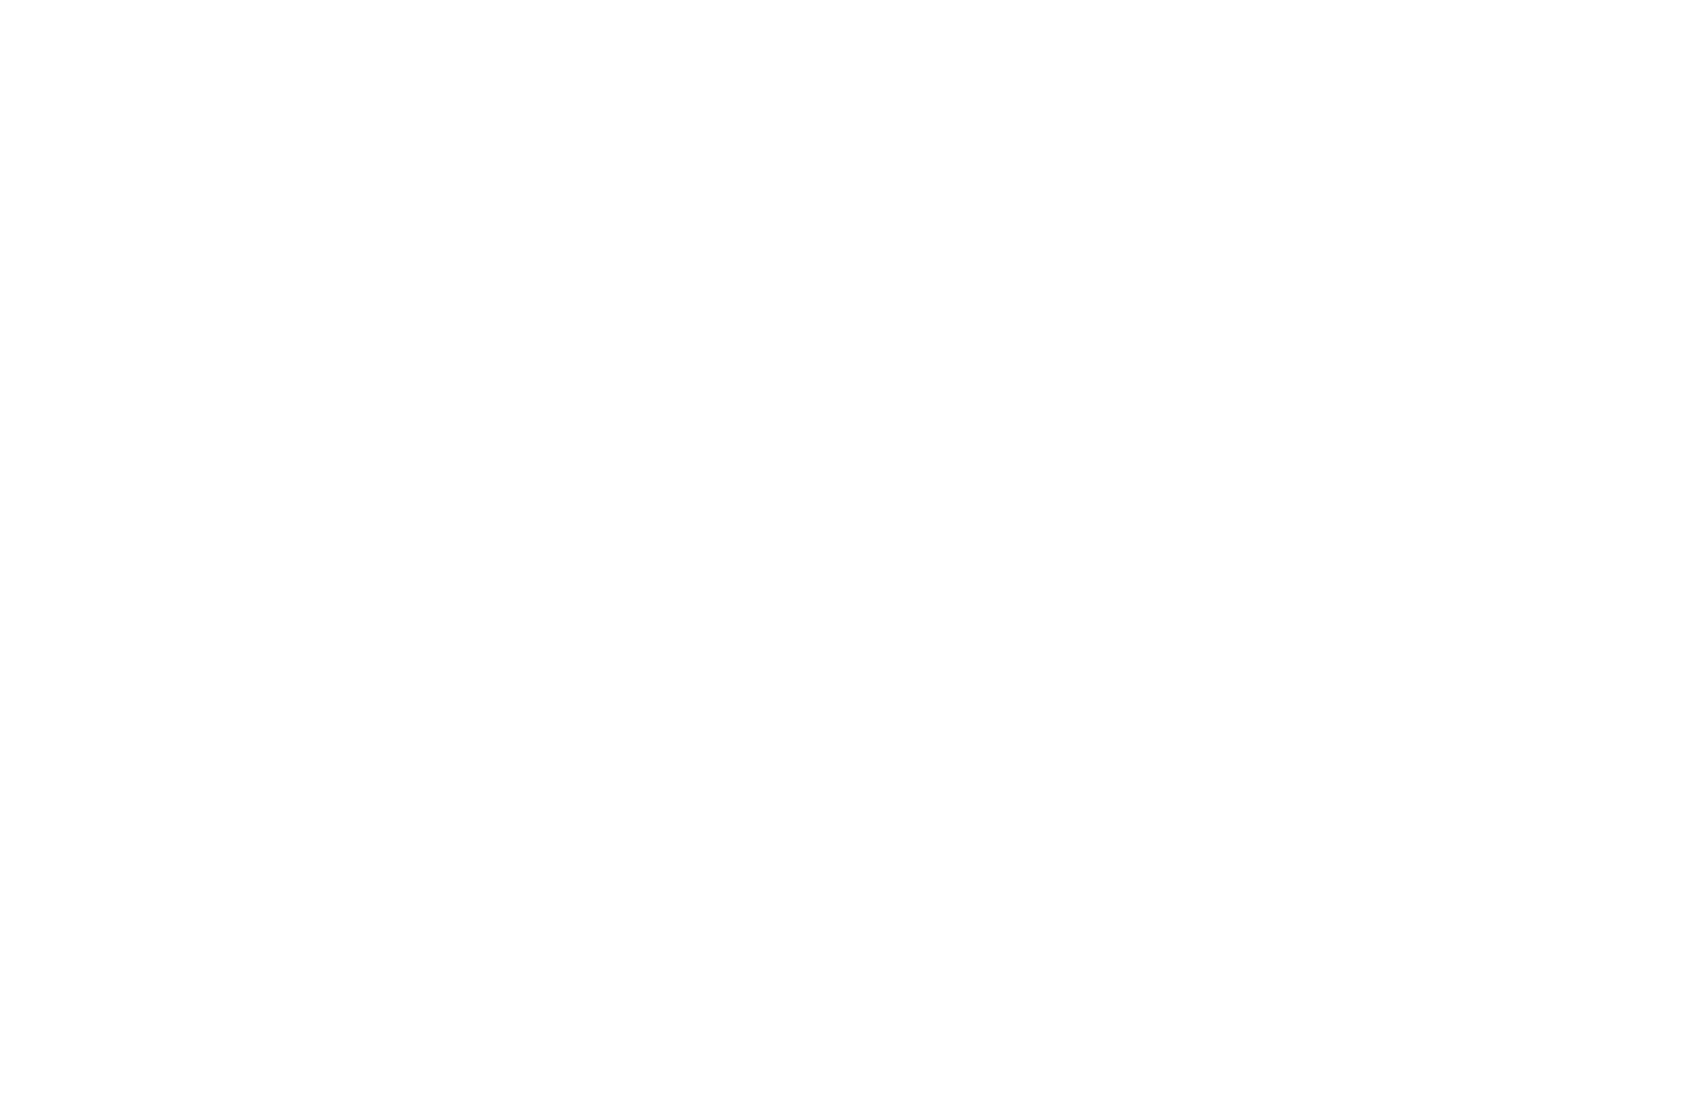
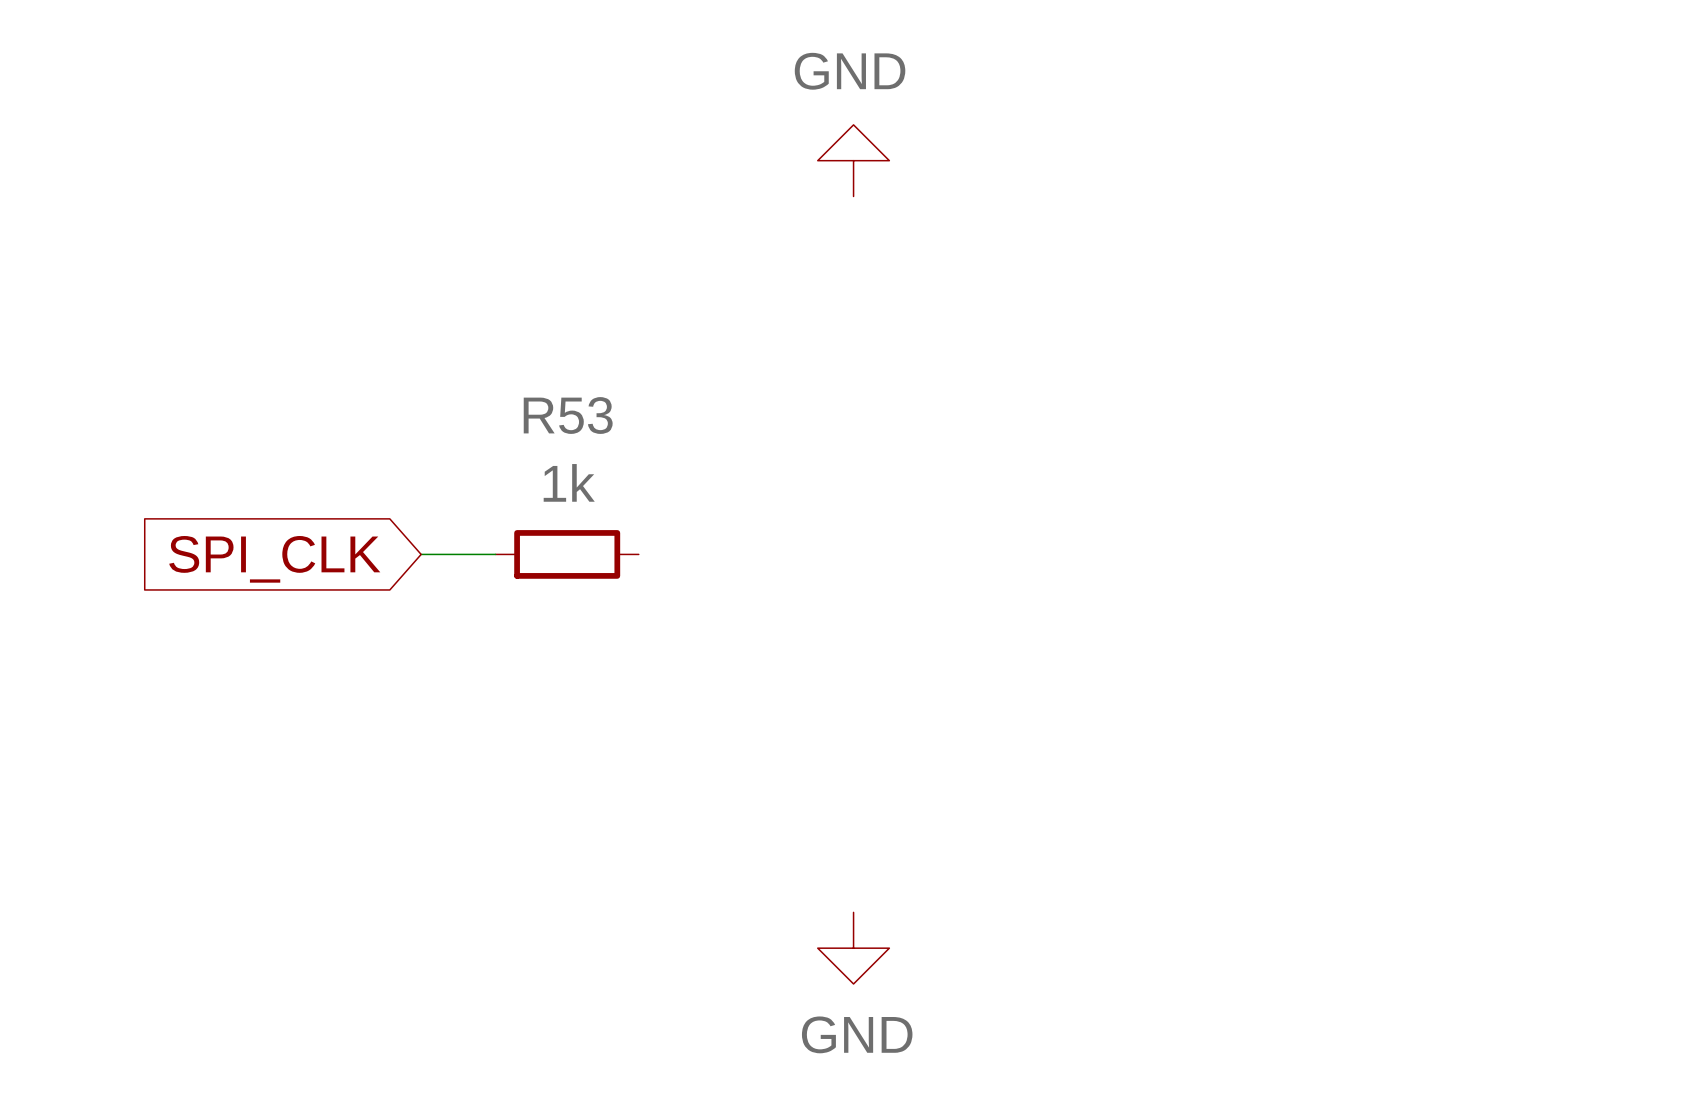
power symbol: none -> GND (853, 160)
wire: none -> (421, 554) (495, 554)
R53: none -> 1k (567, 554)
global label: none -> SPI_CLK (274, 559)
power symbol: none -> GND (853, 948)

